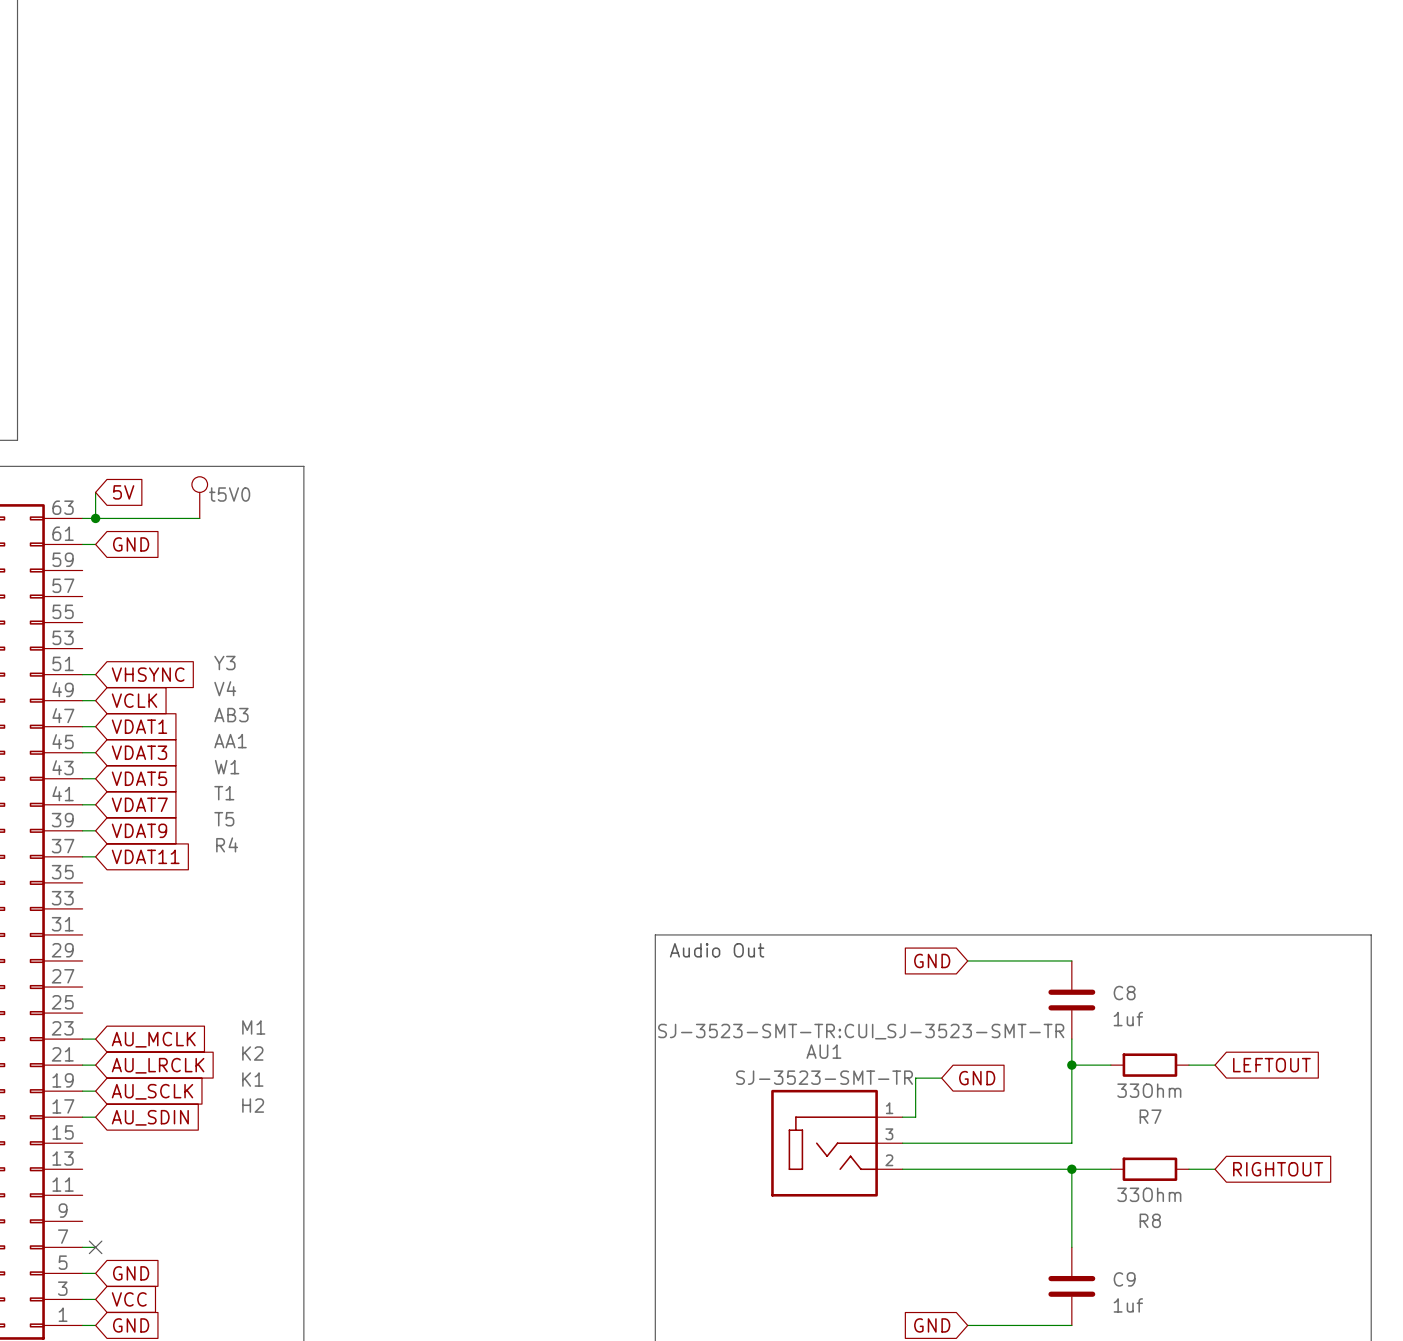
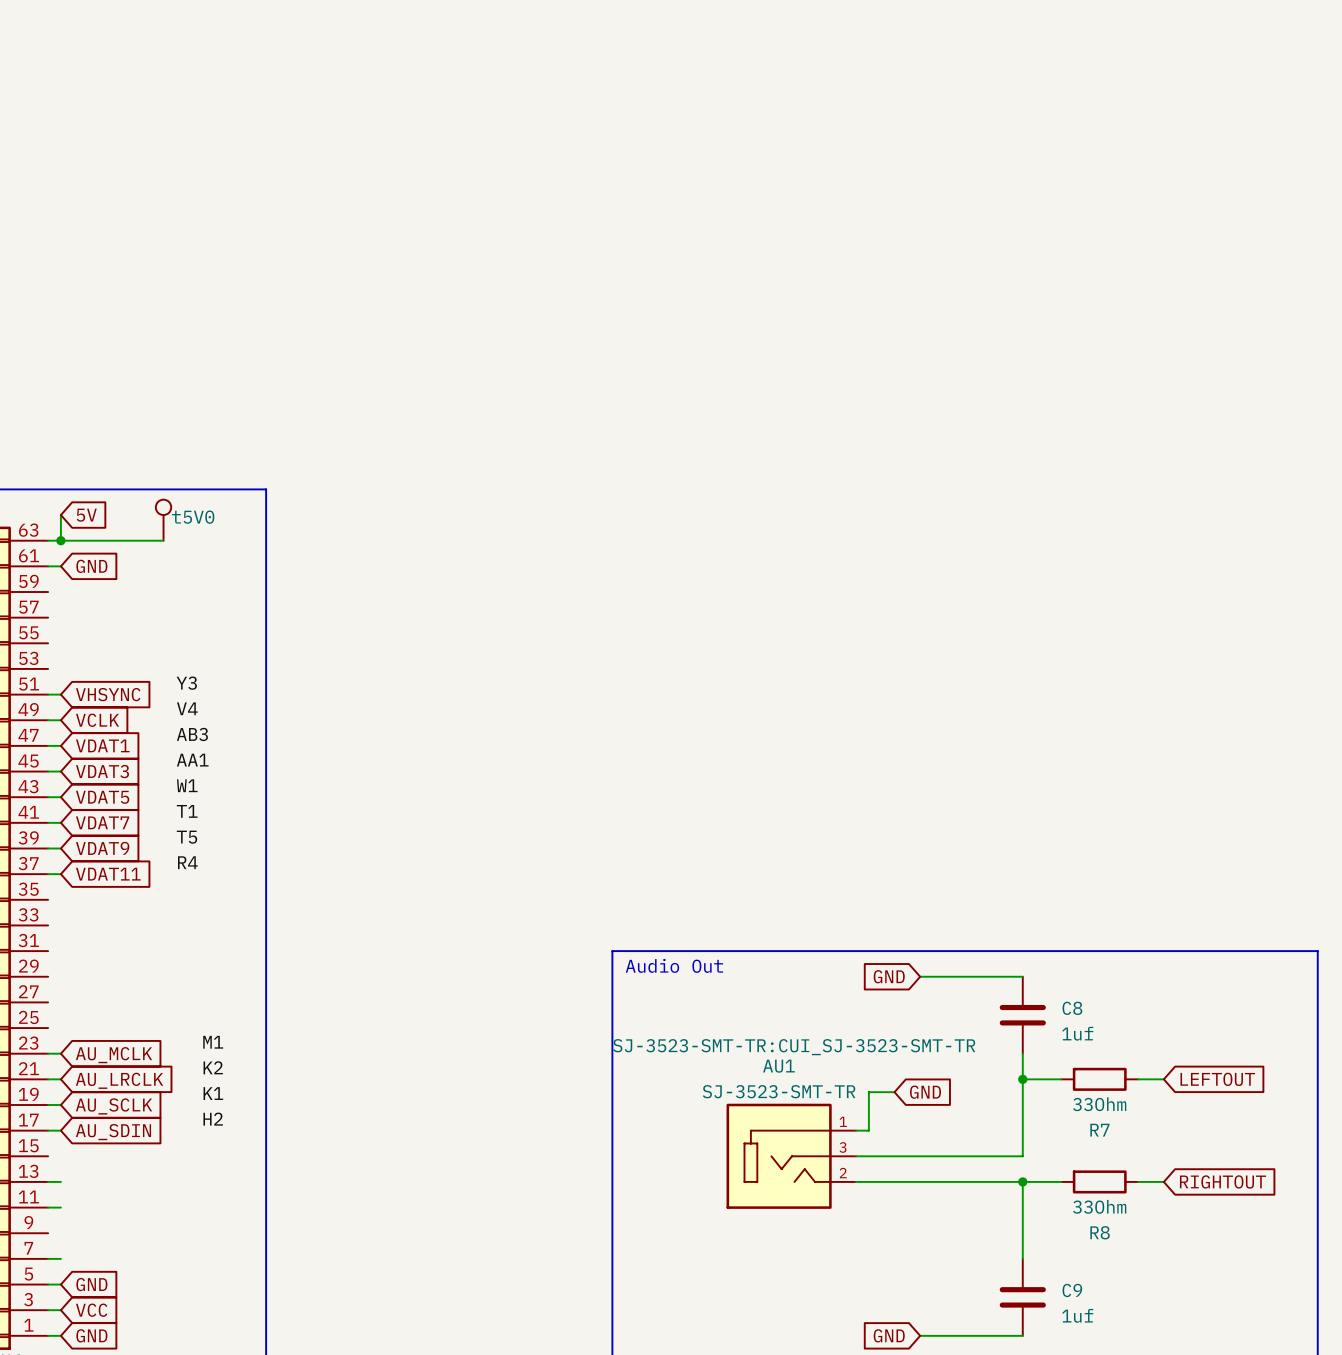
wire: none -> (48, 1181) (60, 1181)
wire: none -> (48, 1207) (60, 1207)
no-connect mark: (95, 1247) -> none

